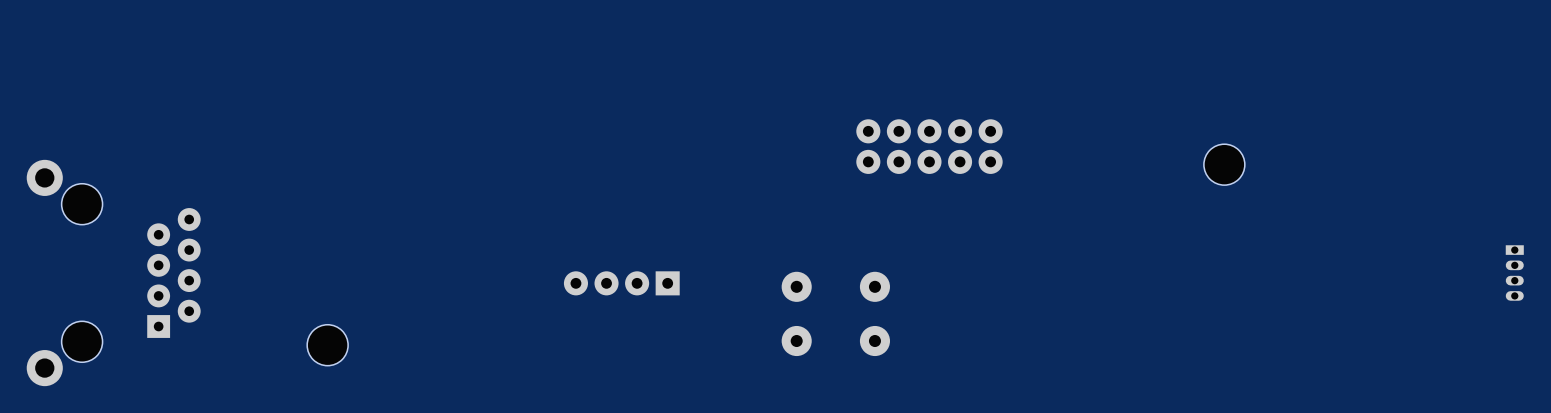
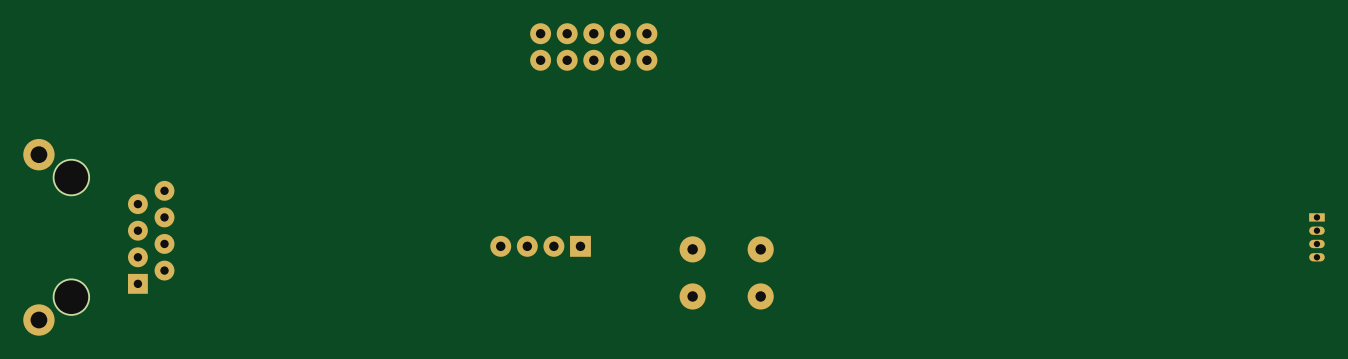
part position: (929, 146) -> (593, 46)
part: (1224, 164) -> none
part: (327, 345) -> none

